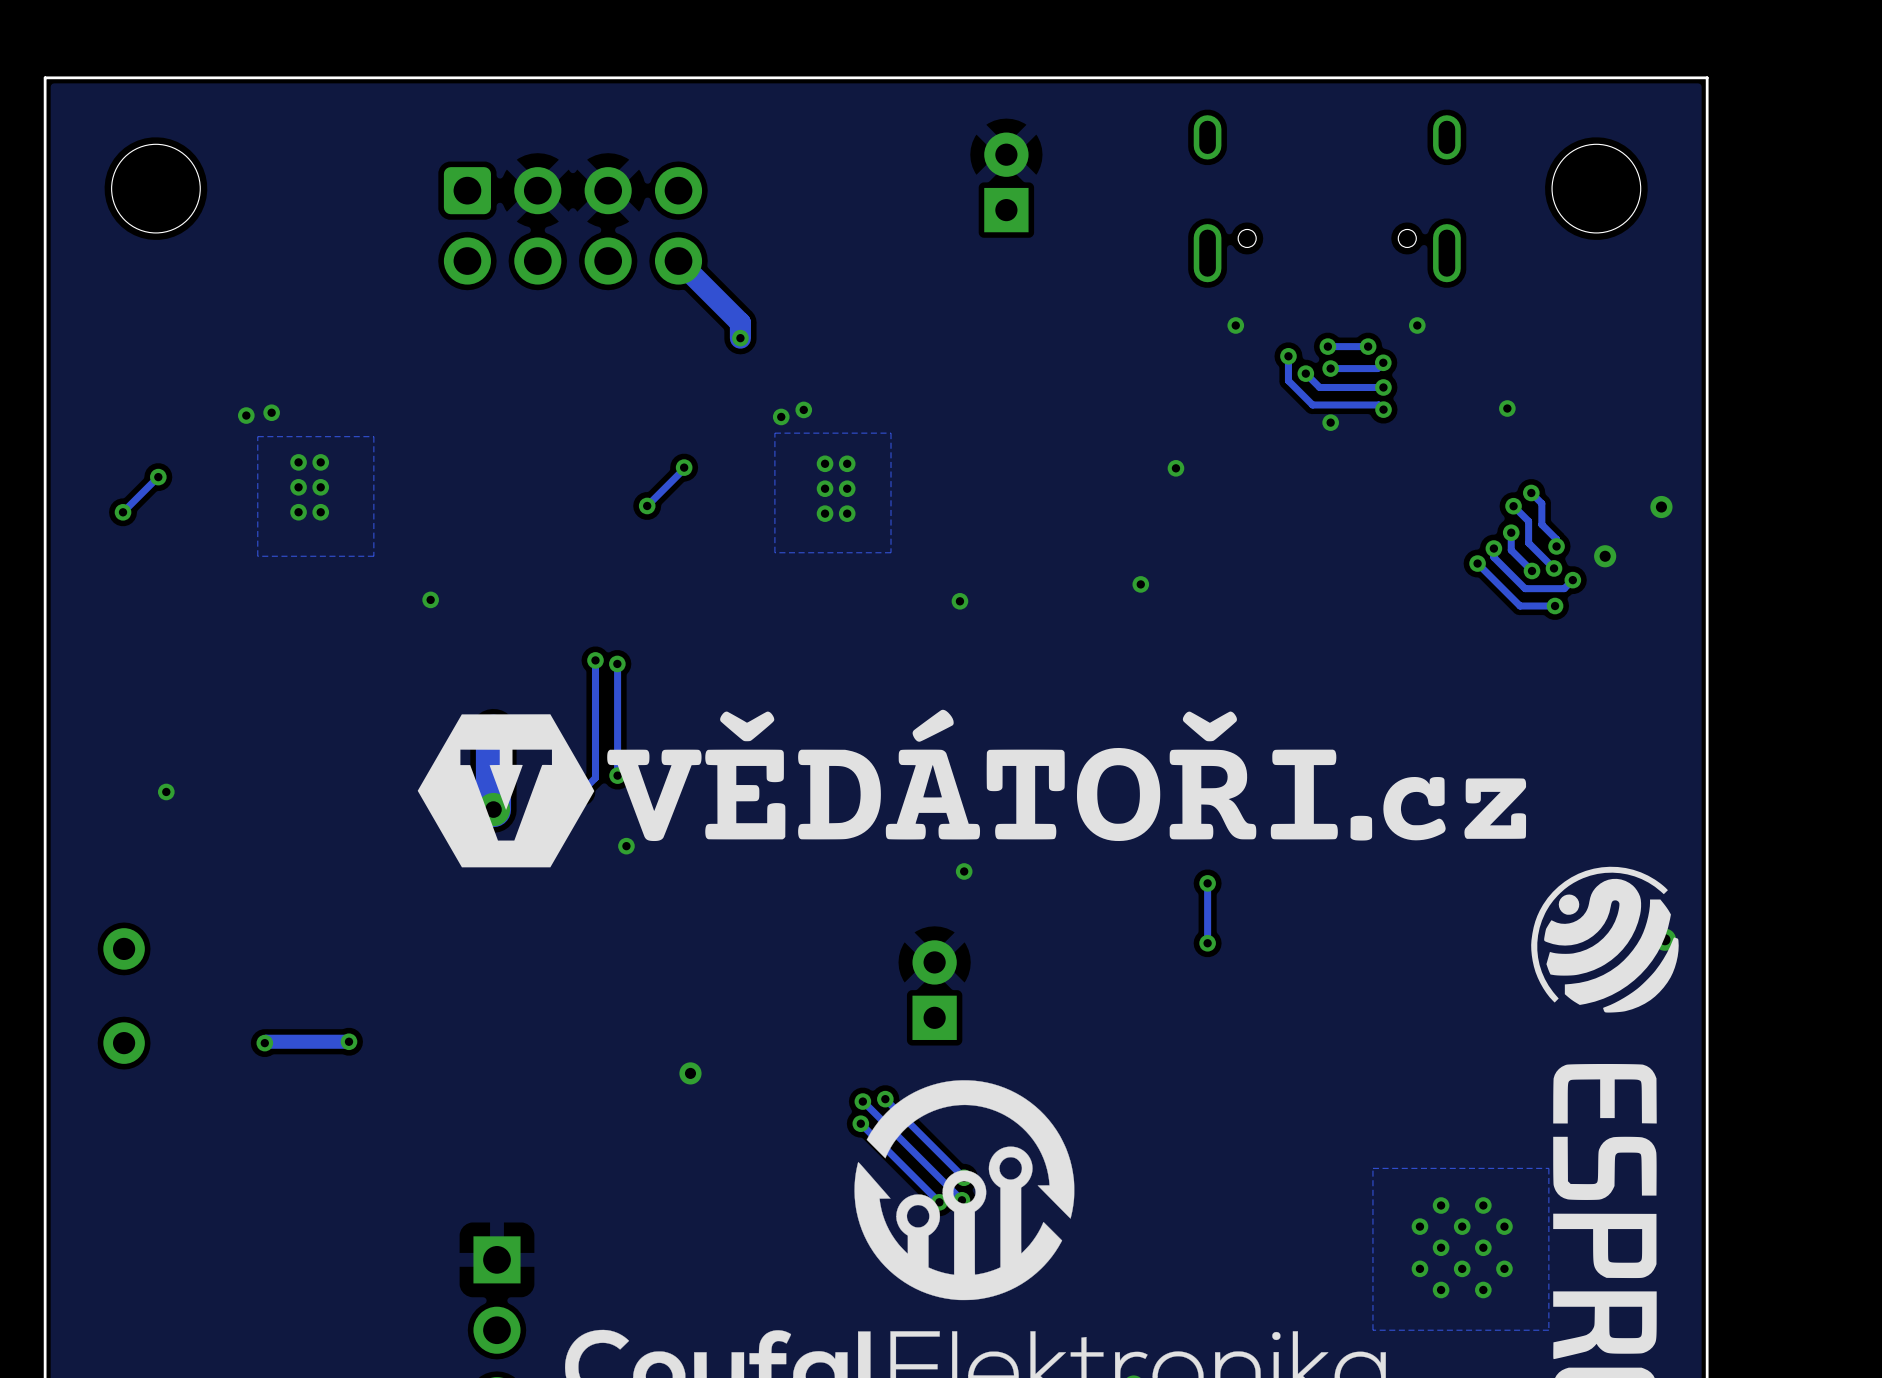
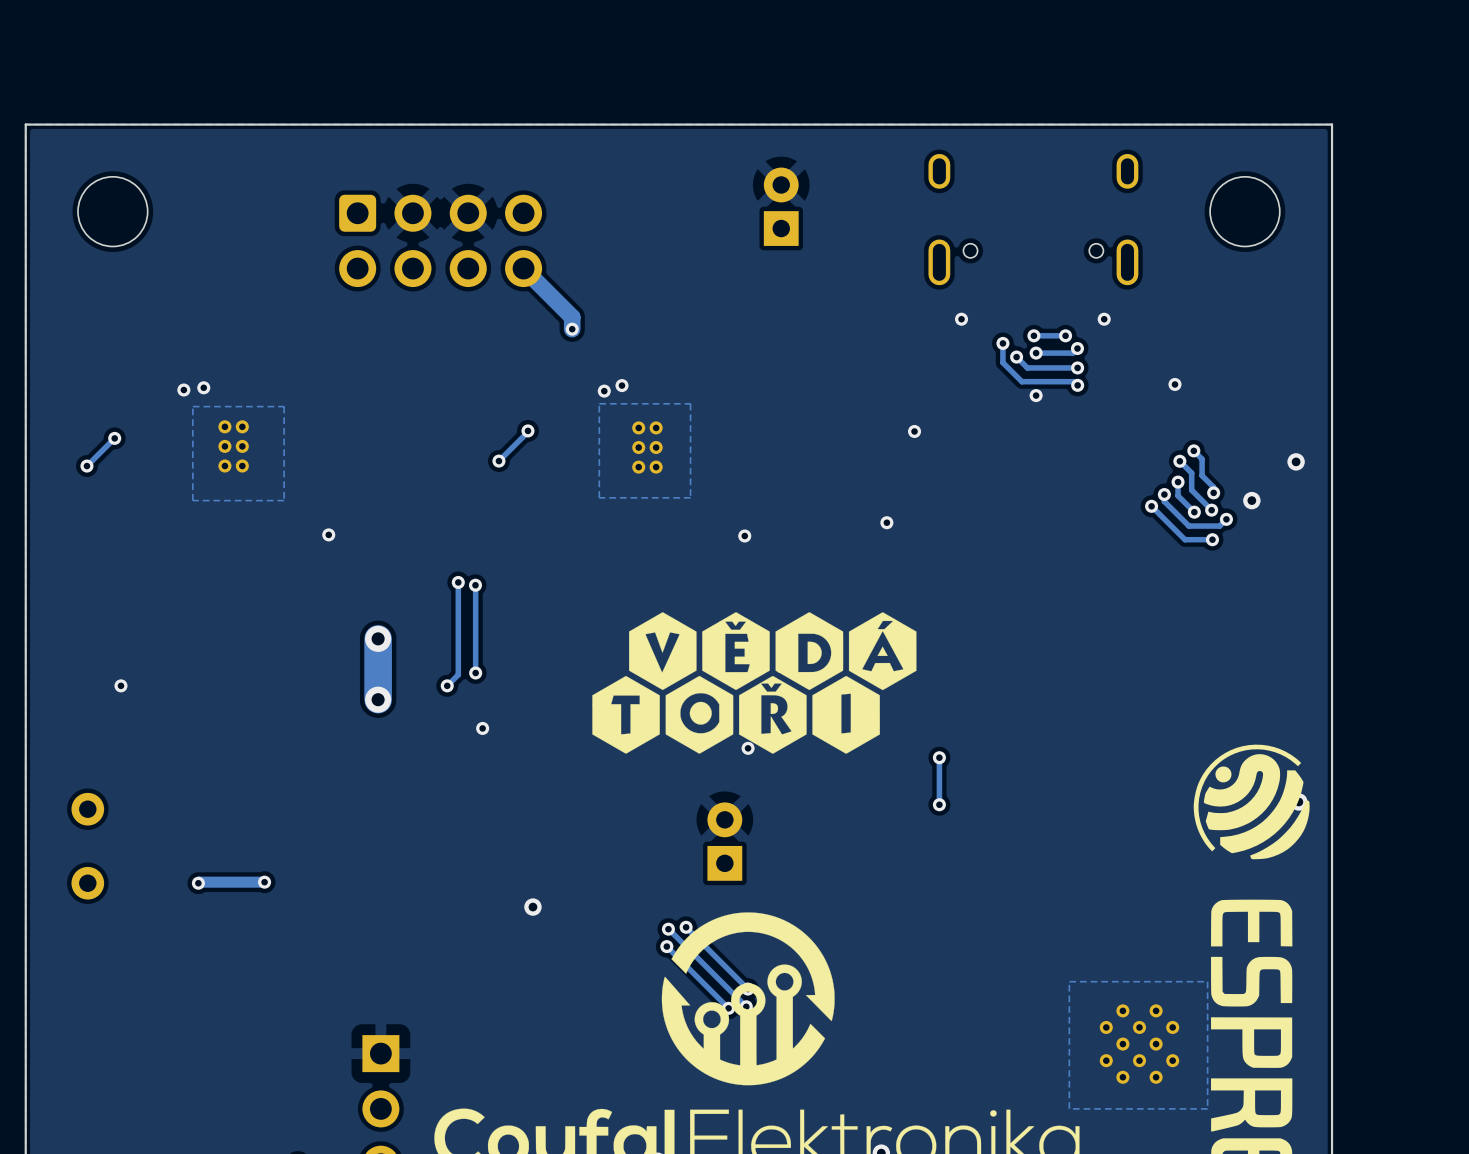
drawing shape: [417, 709, 1527, 868] -> [592, 612, 917, 754]

